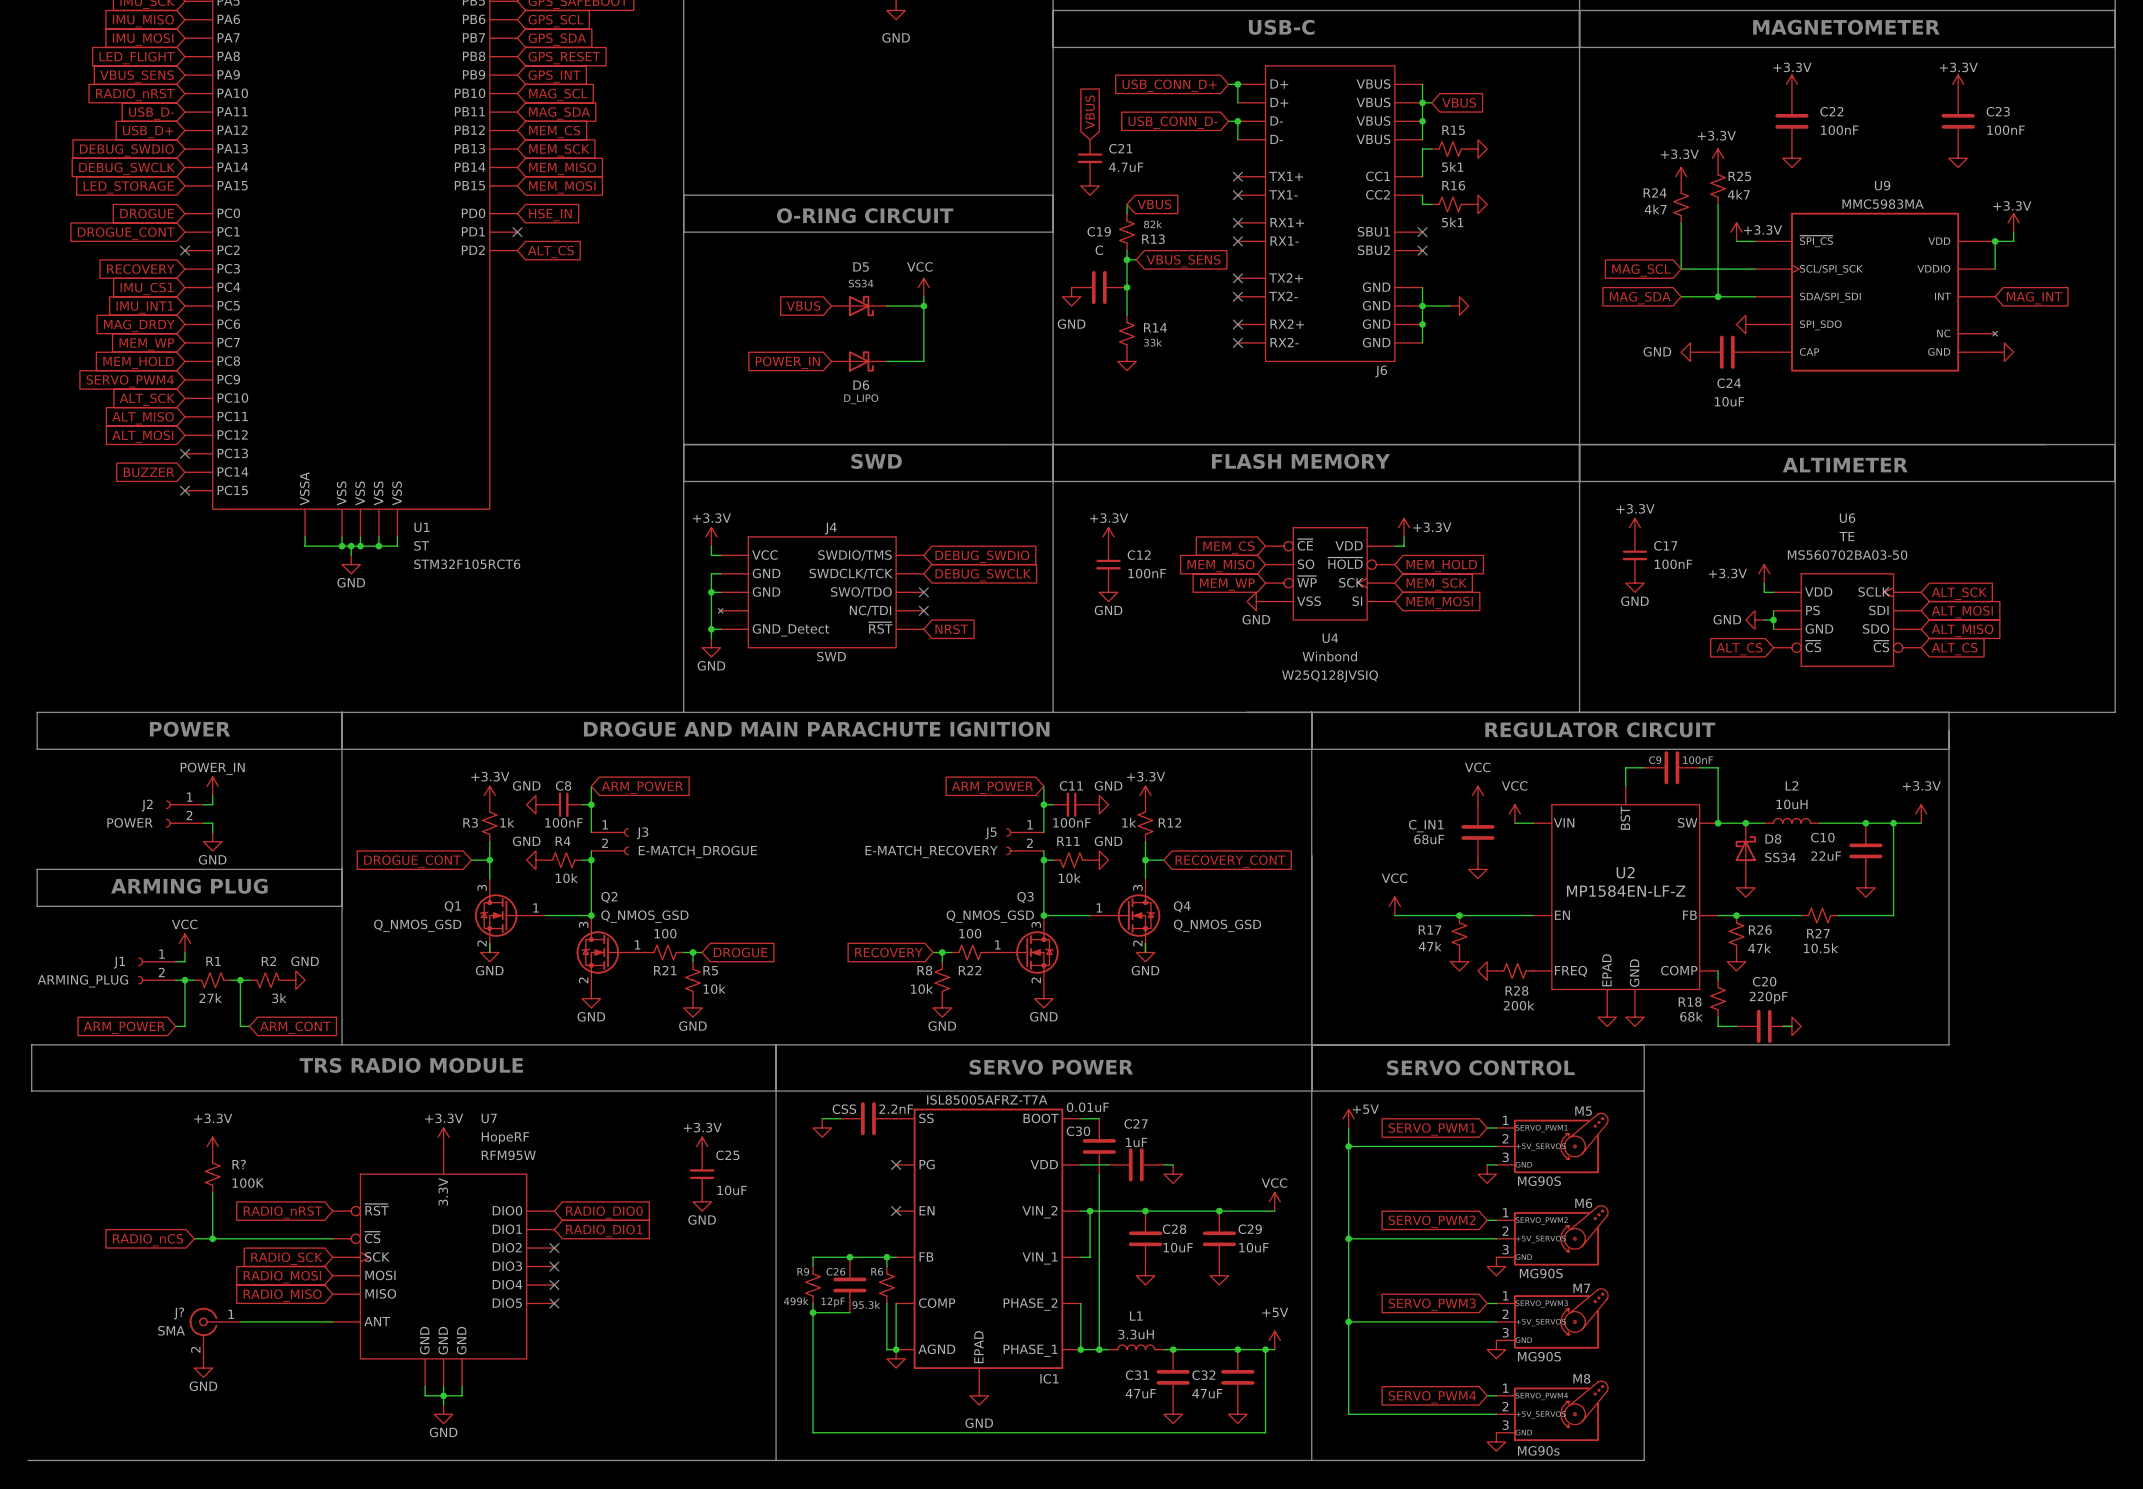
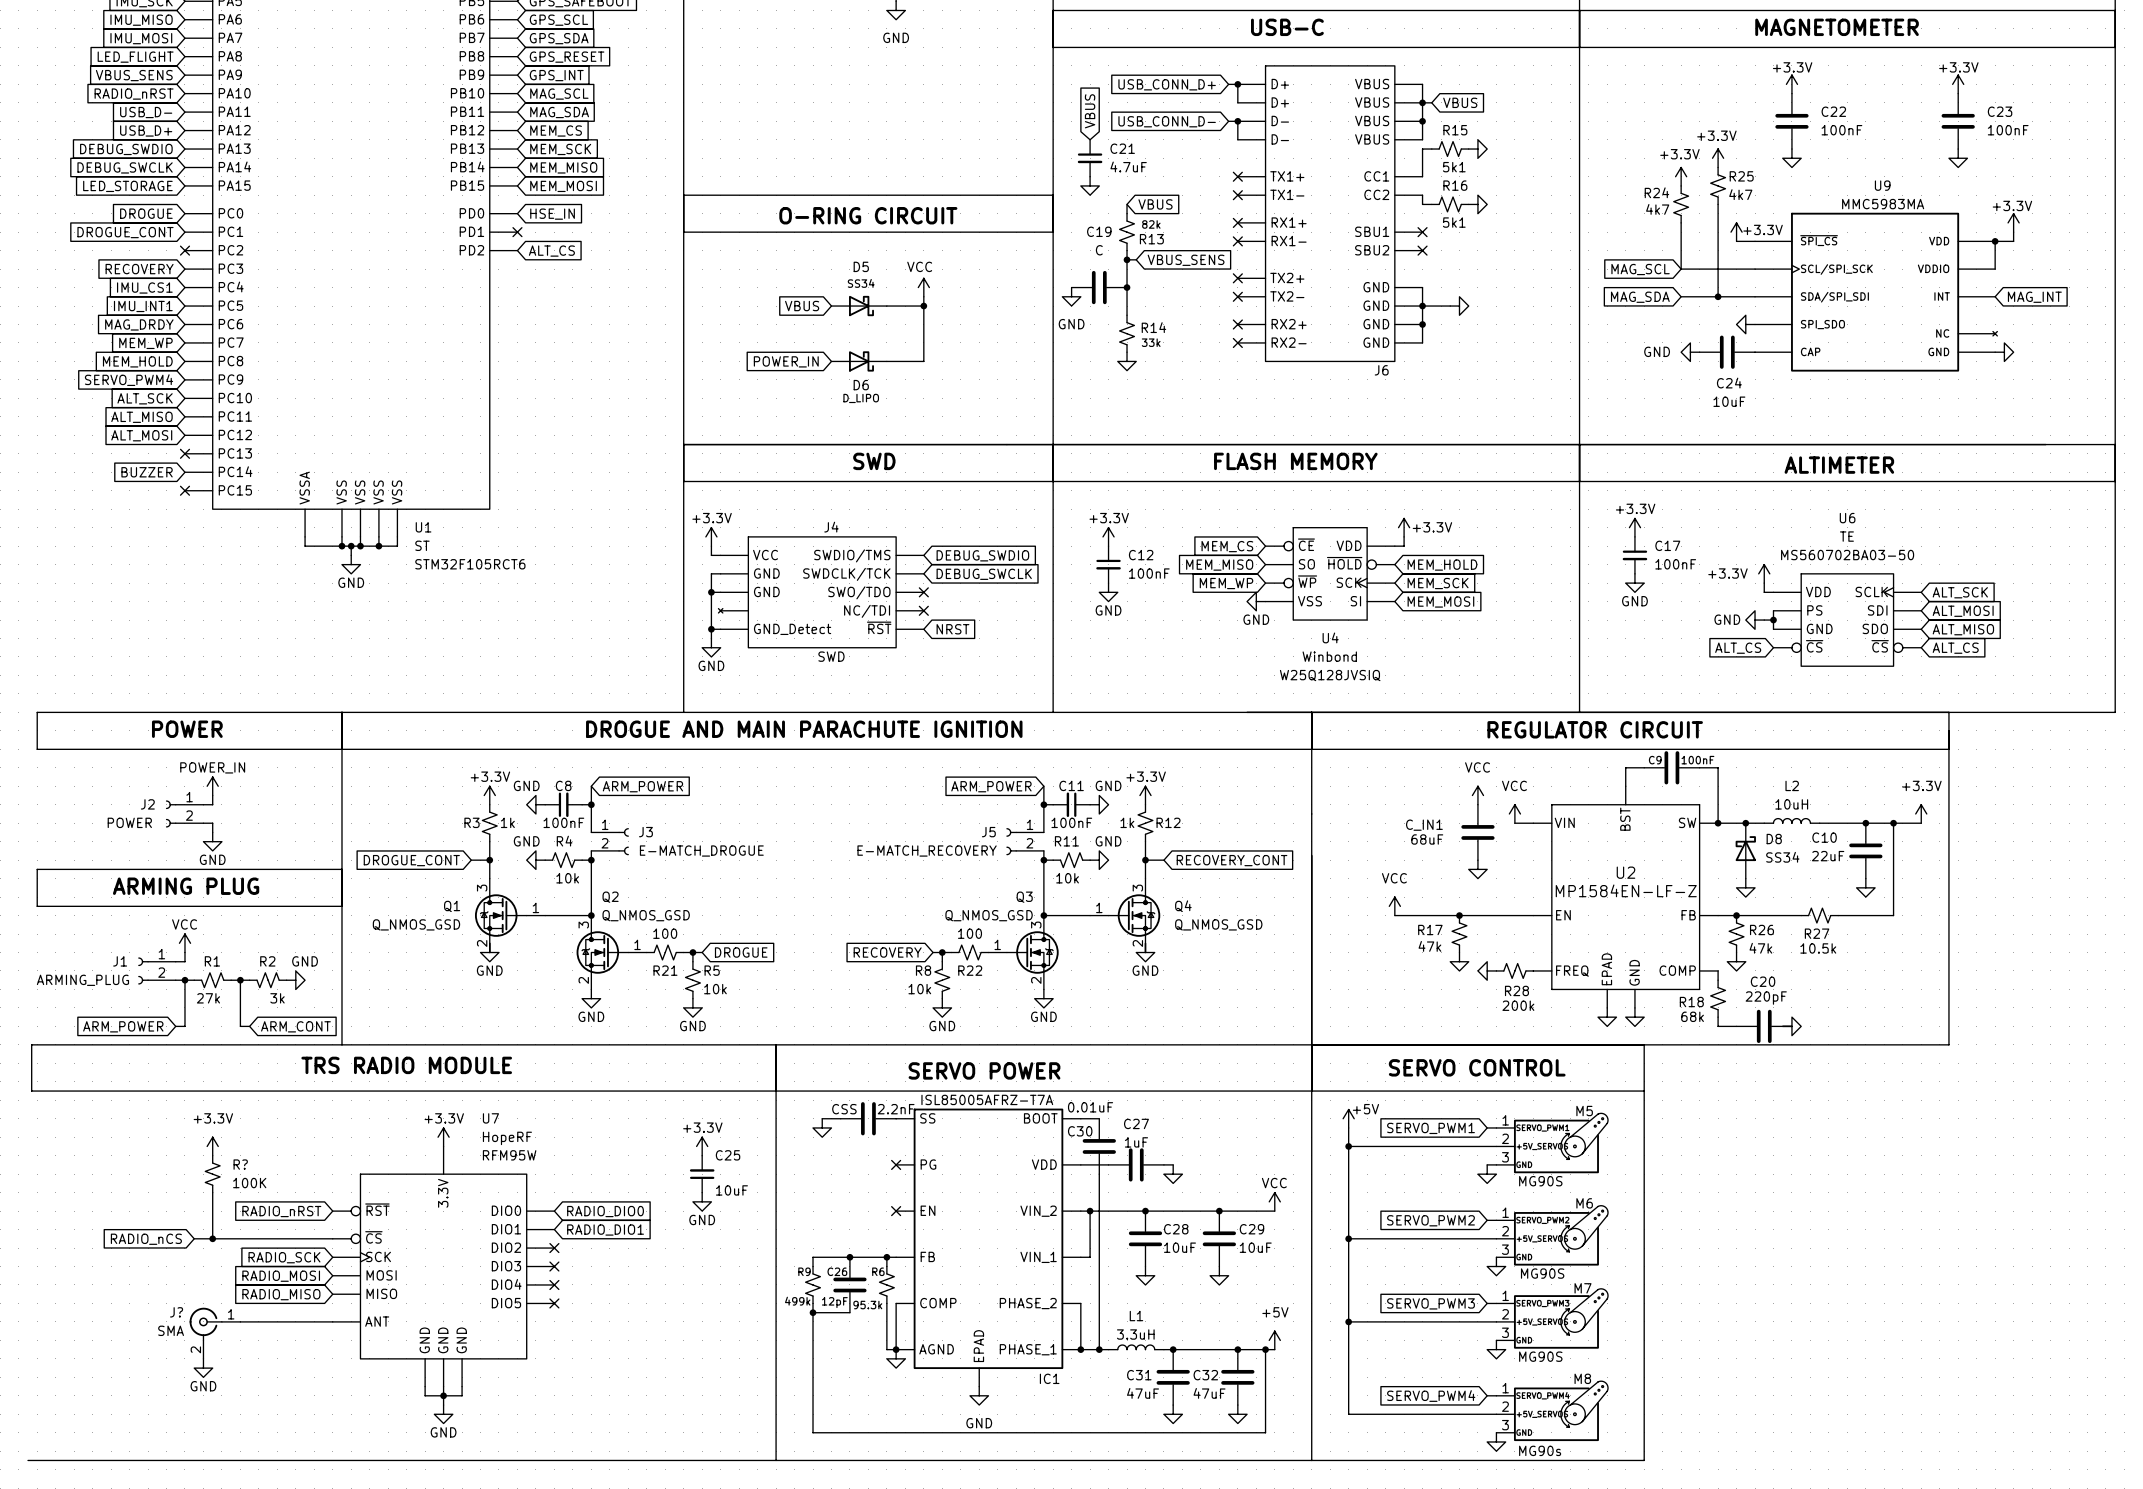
text position: SERVO POWER (1051, 1067) -> SERVO POWER (984, 1070)

